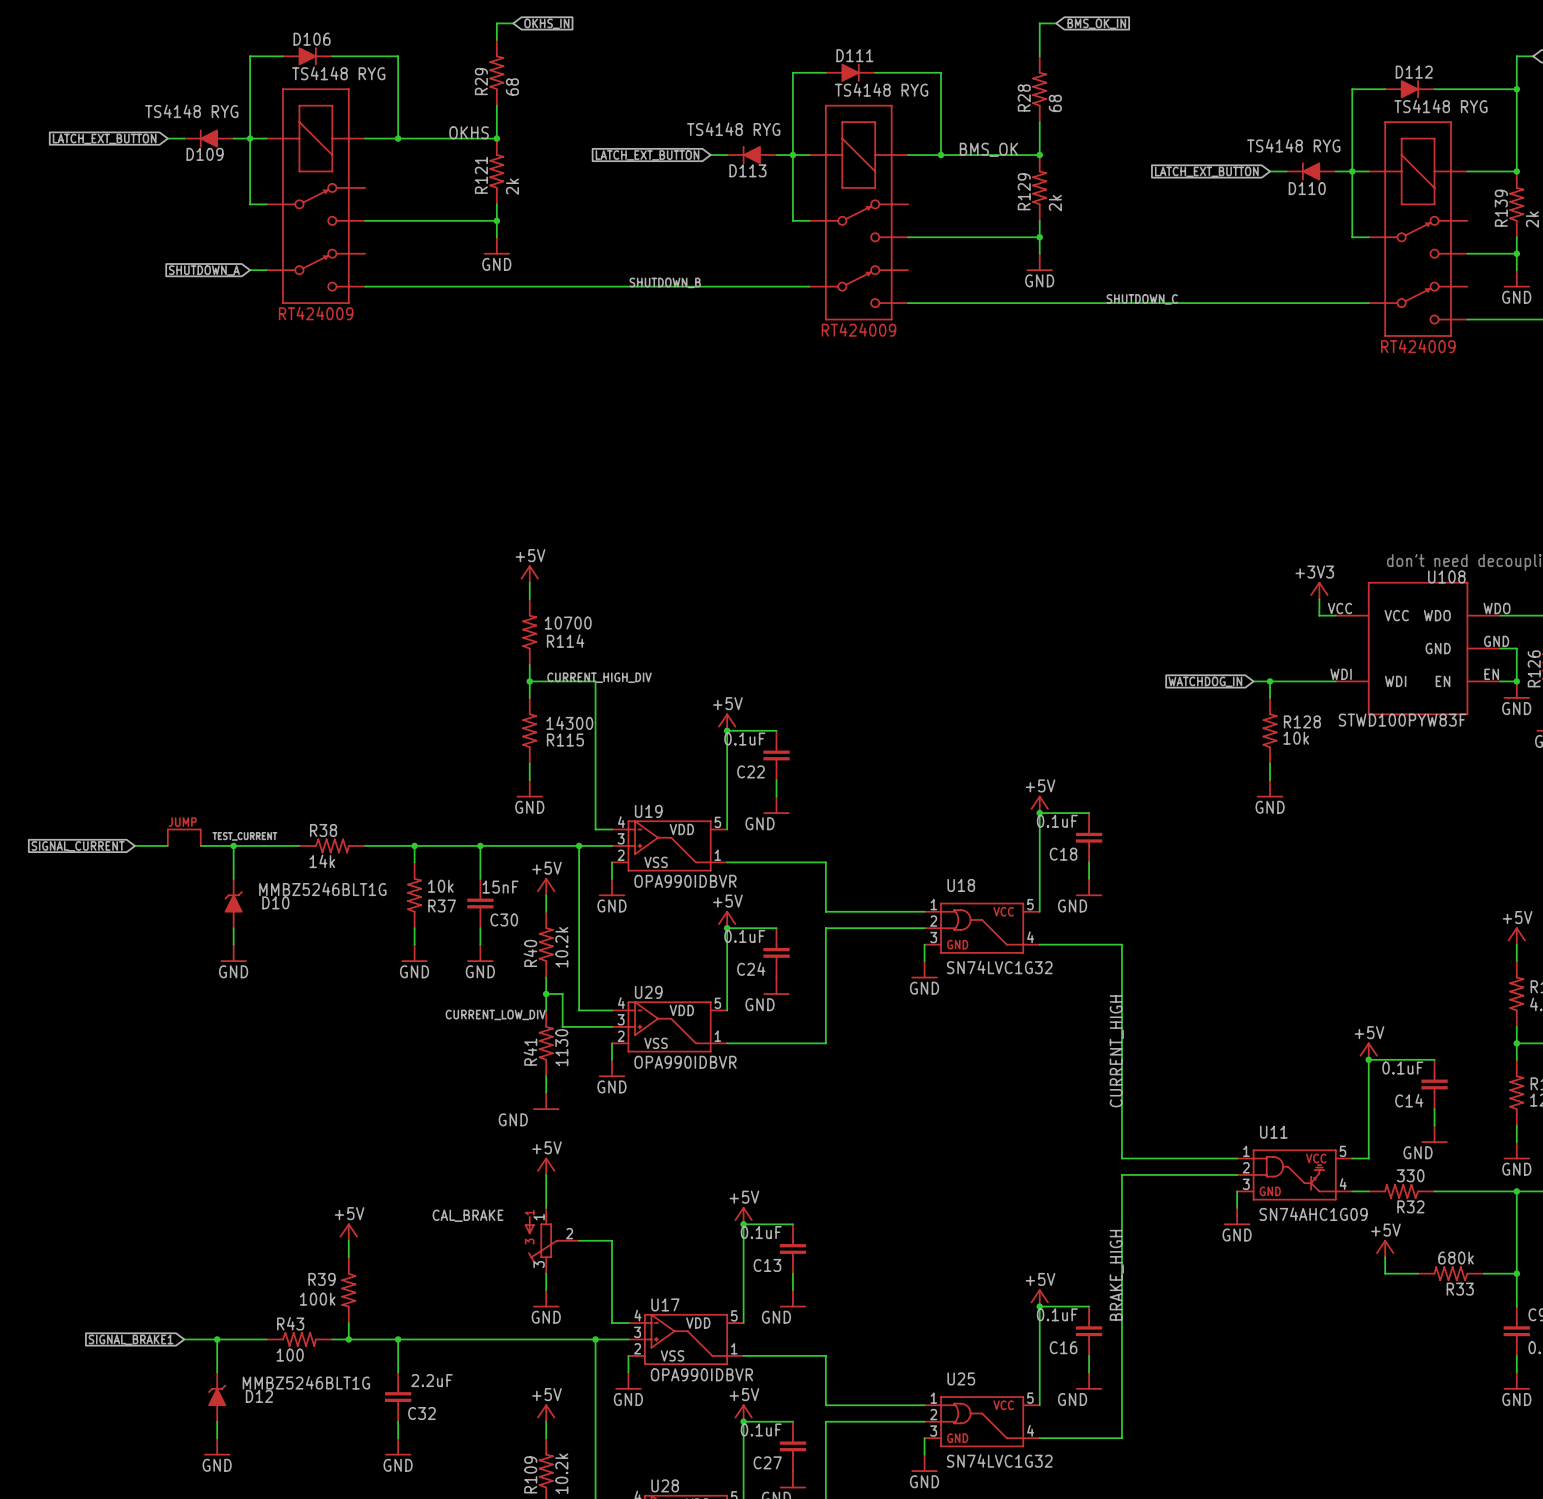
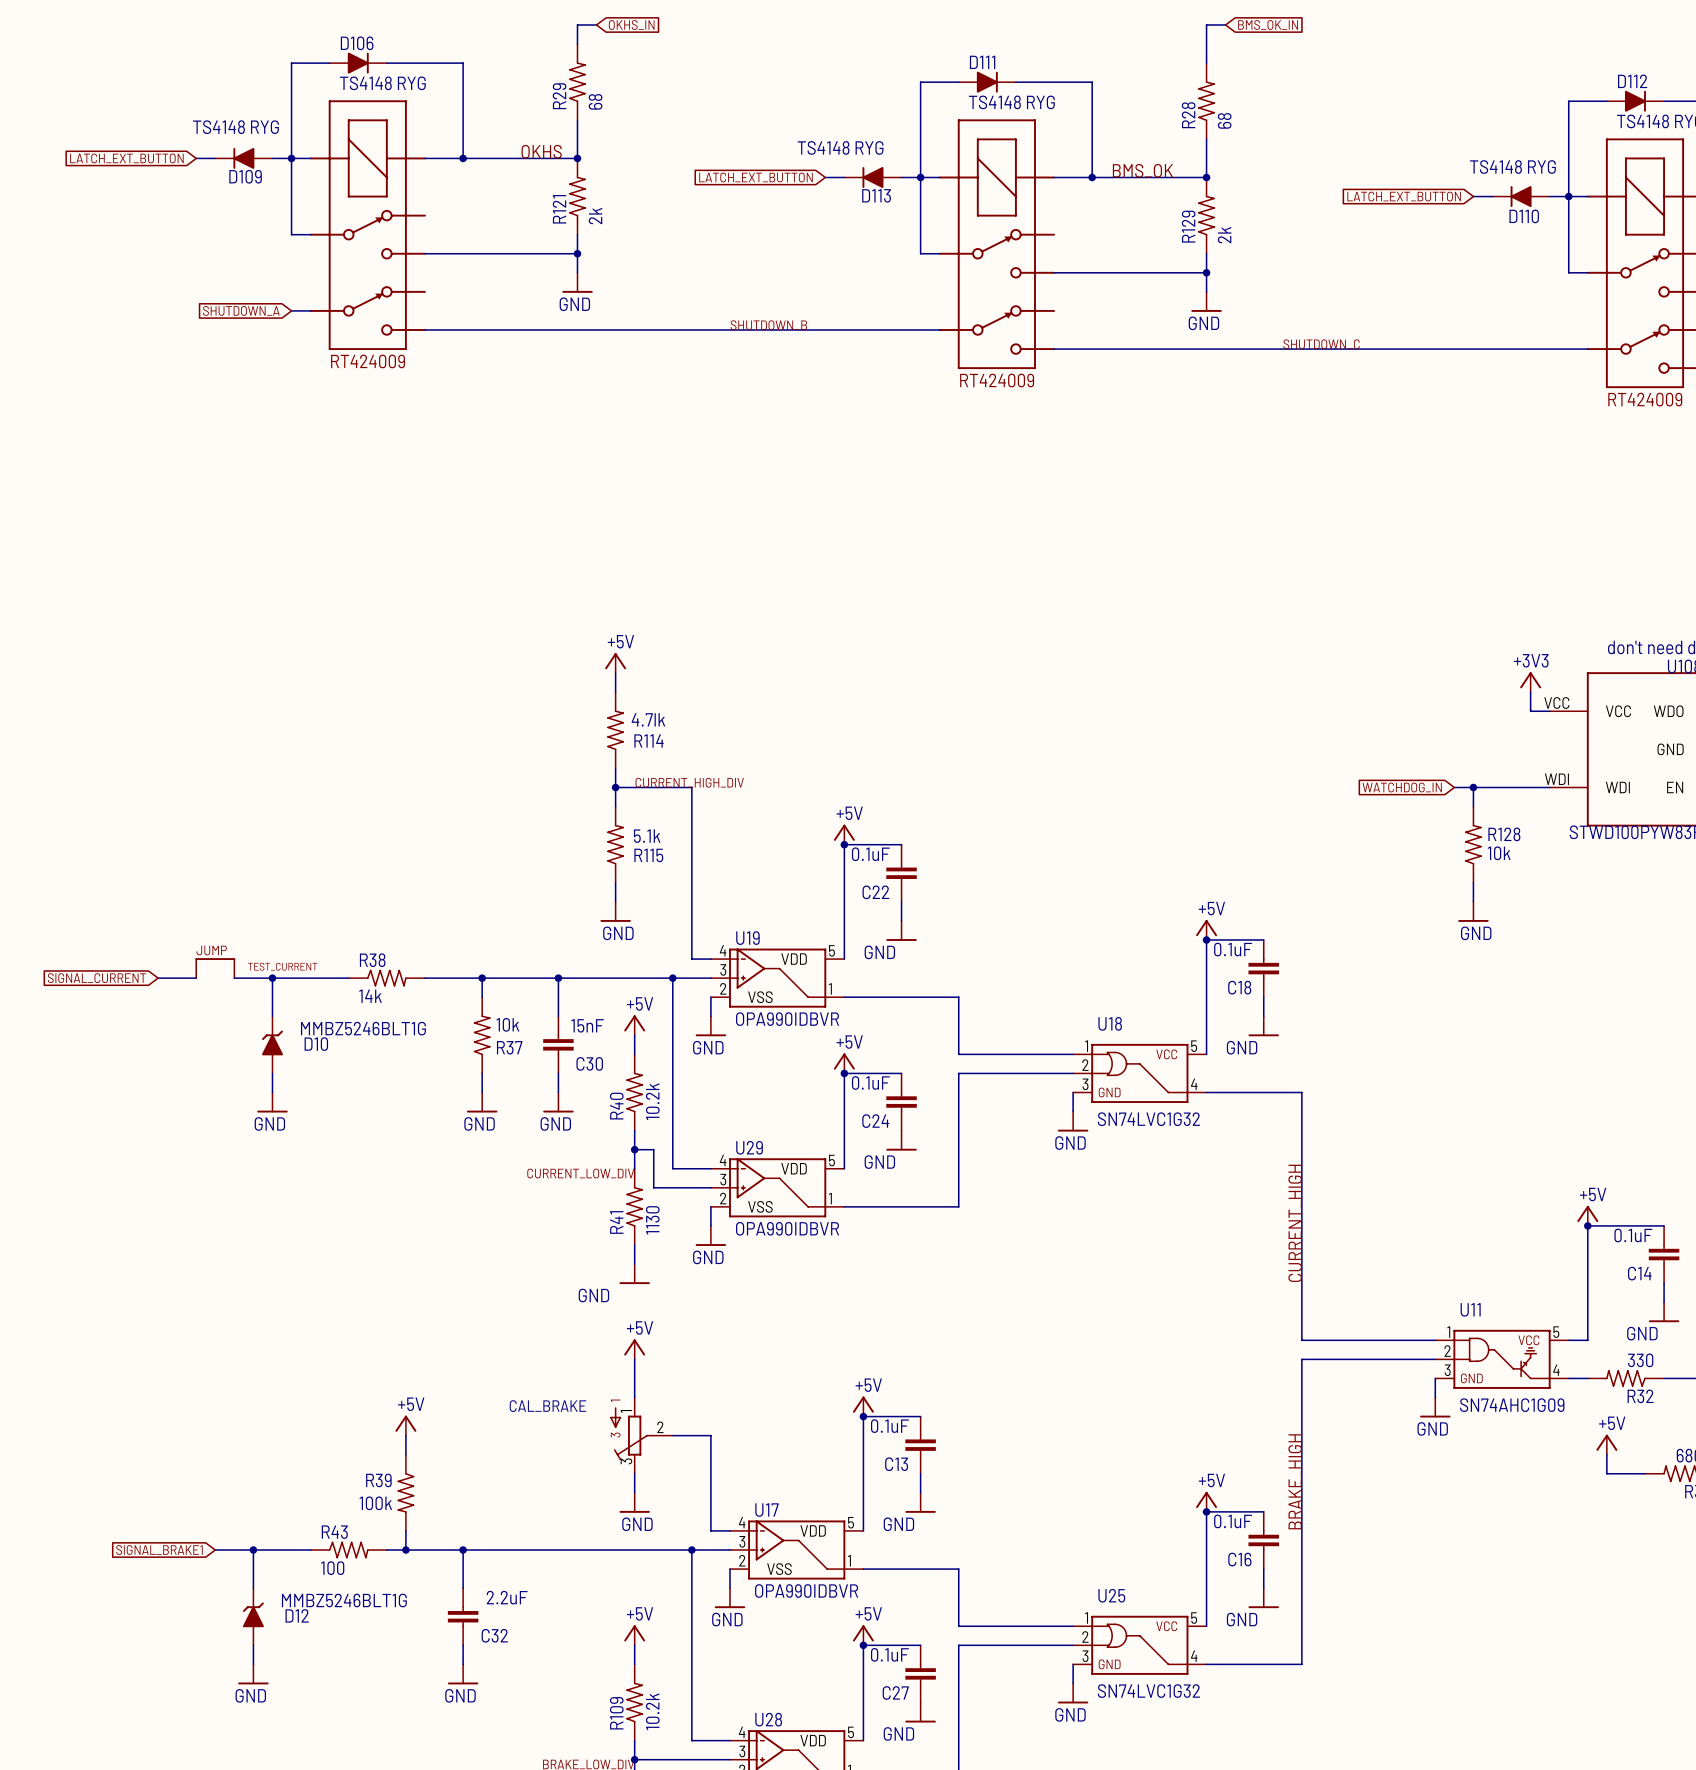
R114 value: 10700 (568, 623) -> 4.7lk (648, 719)
R115 value: 14300 (569, 723) -> 5.1k (647, 836)

